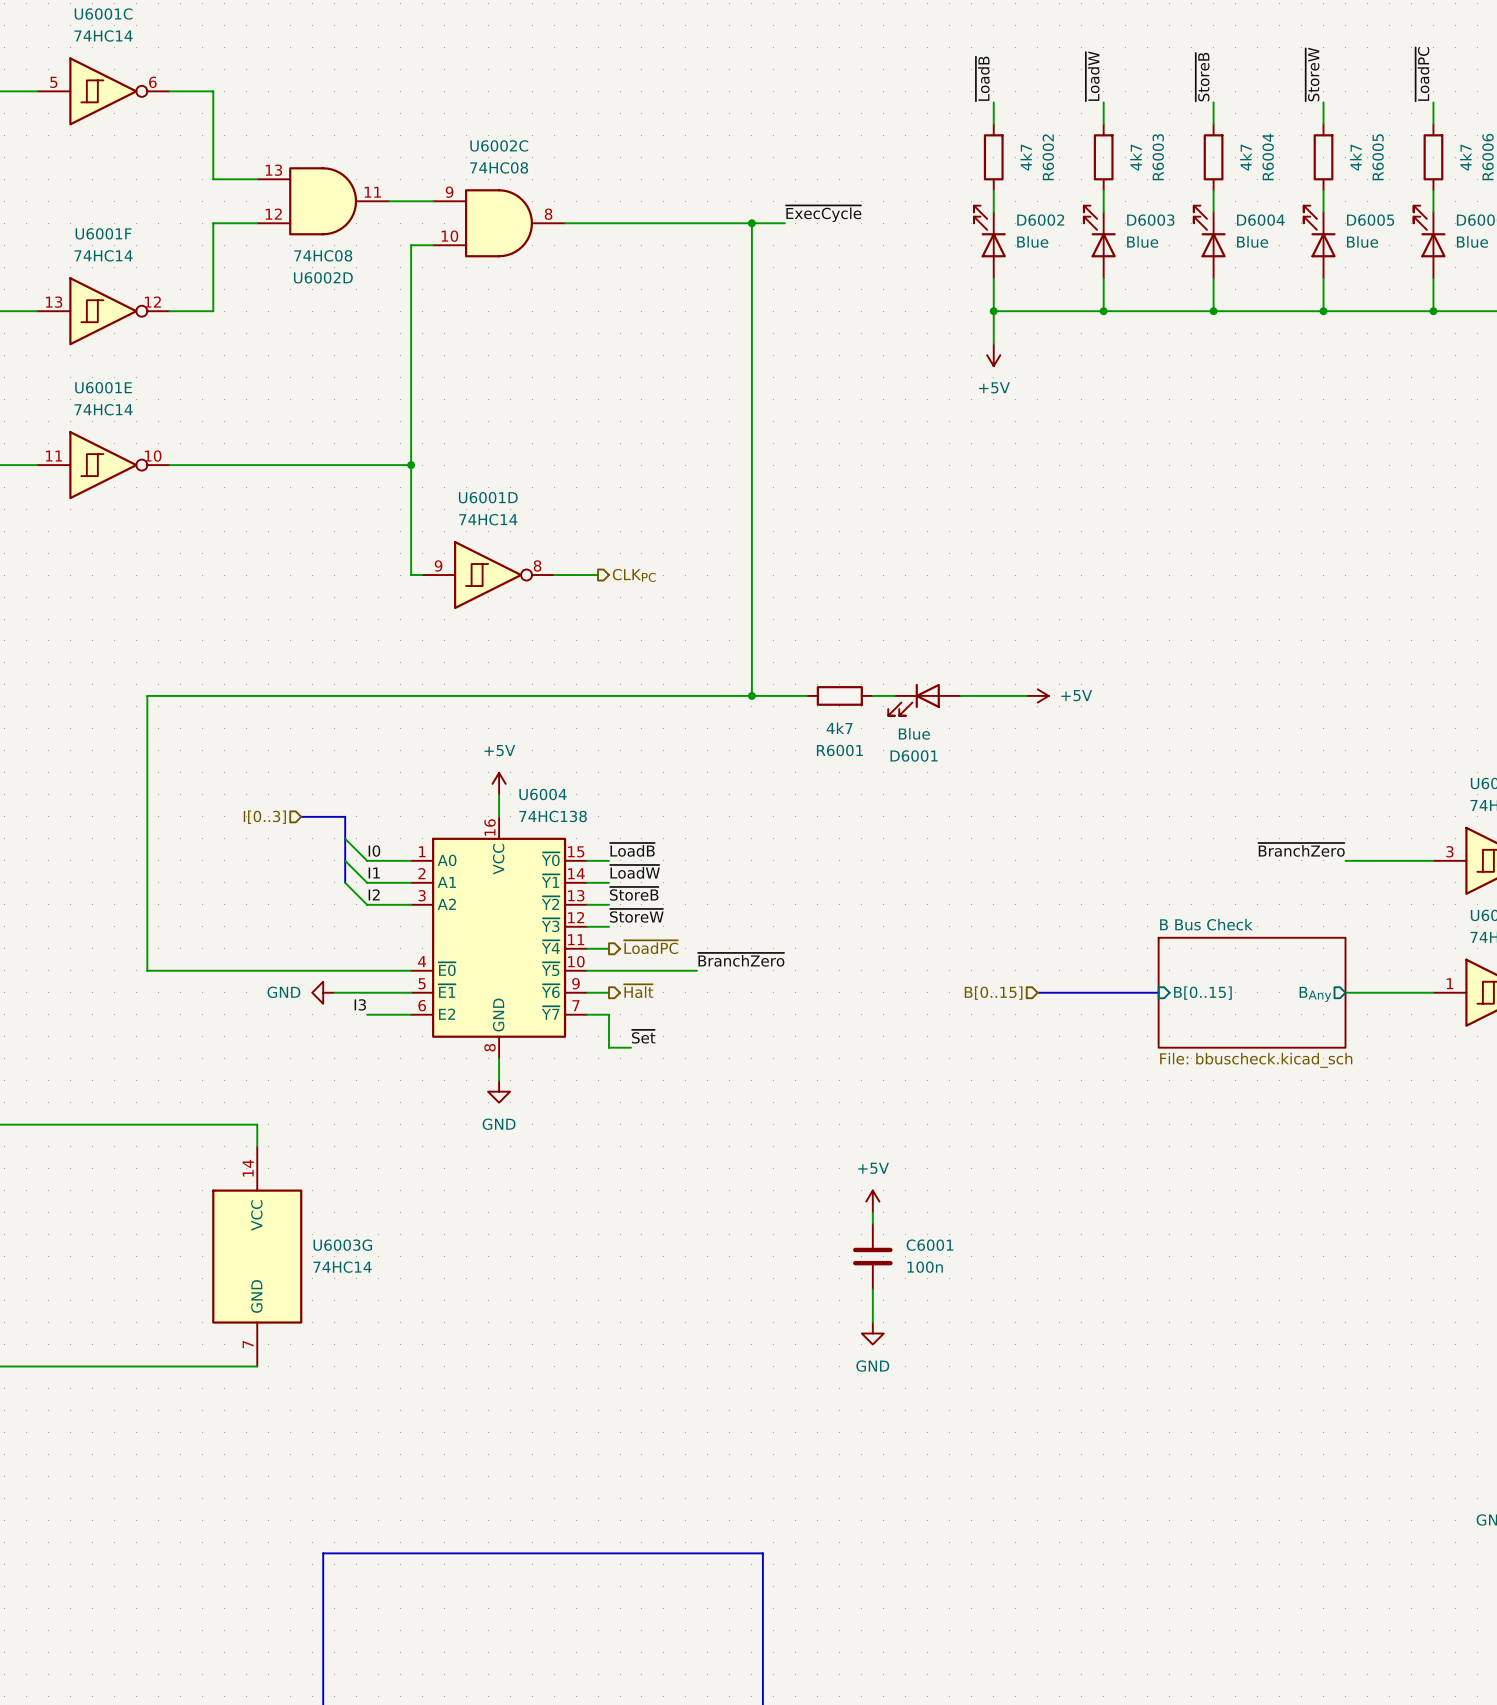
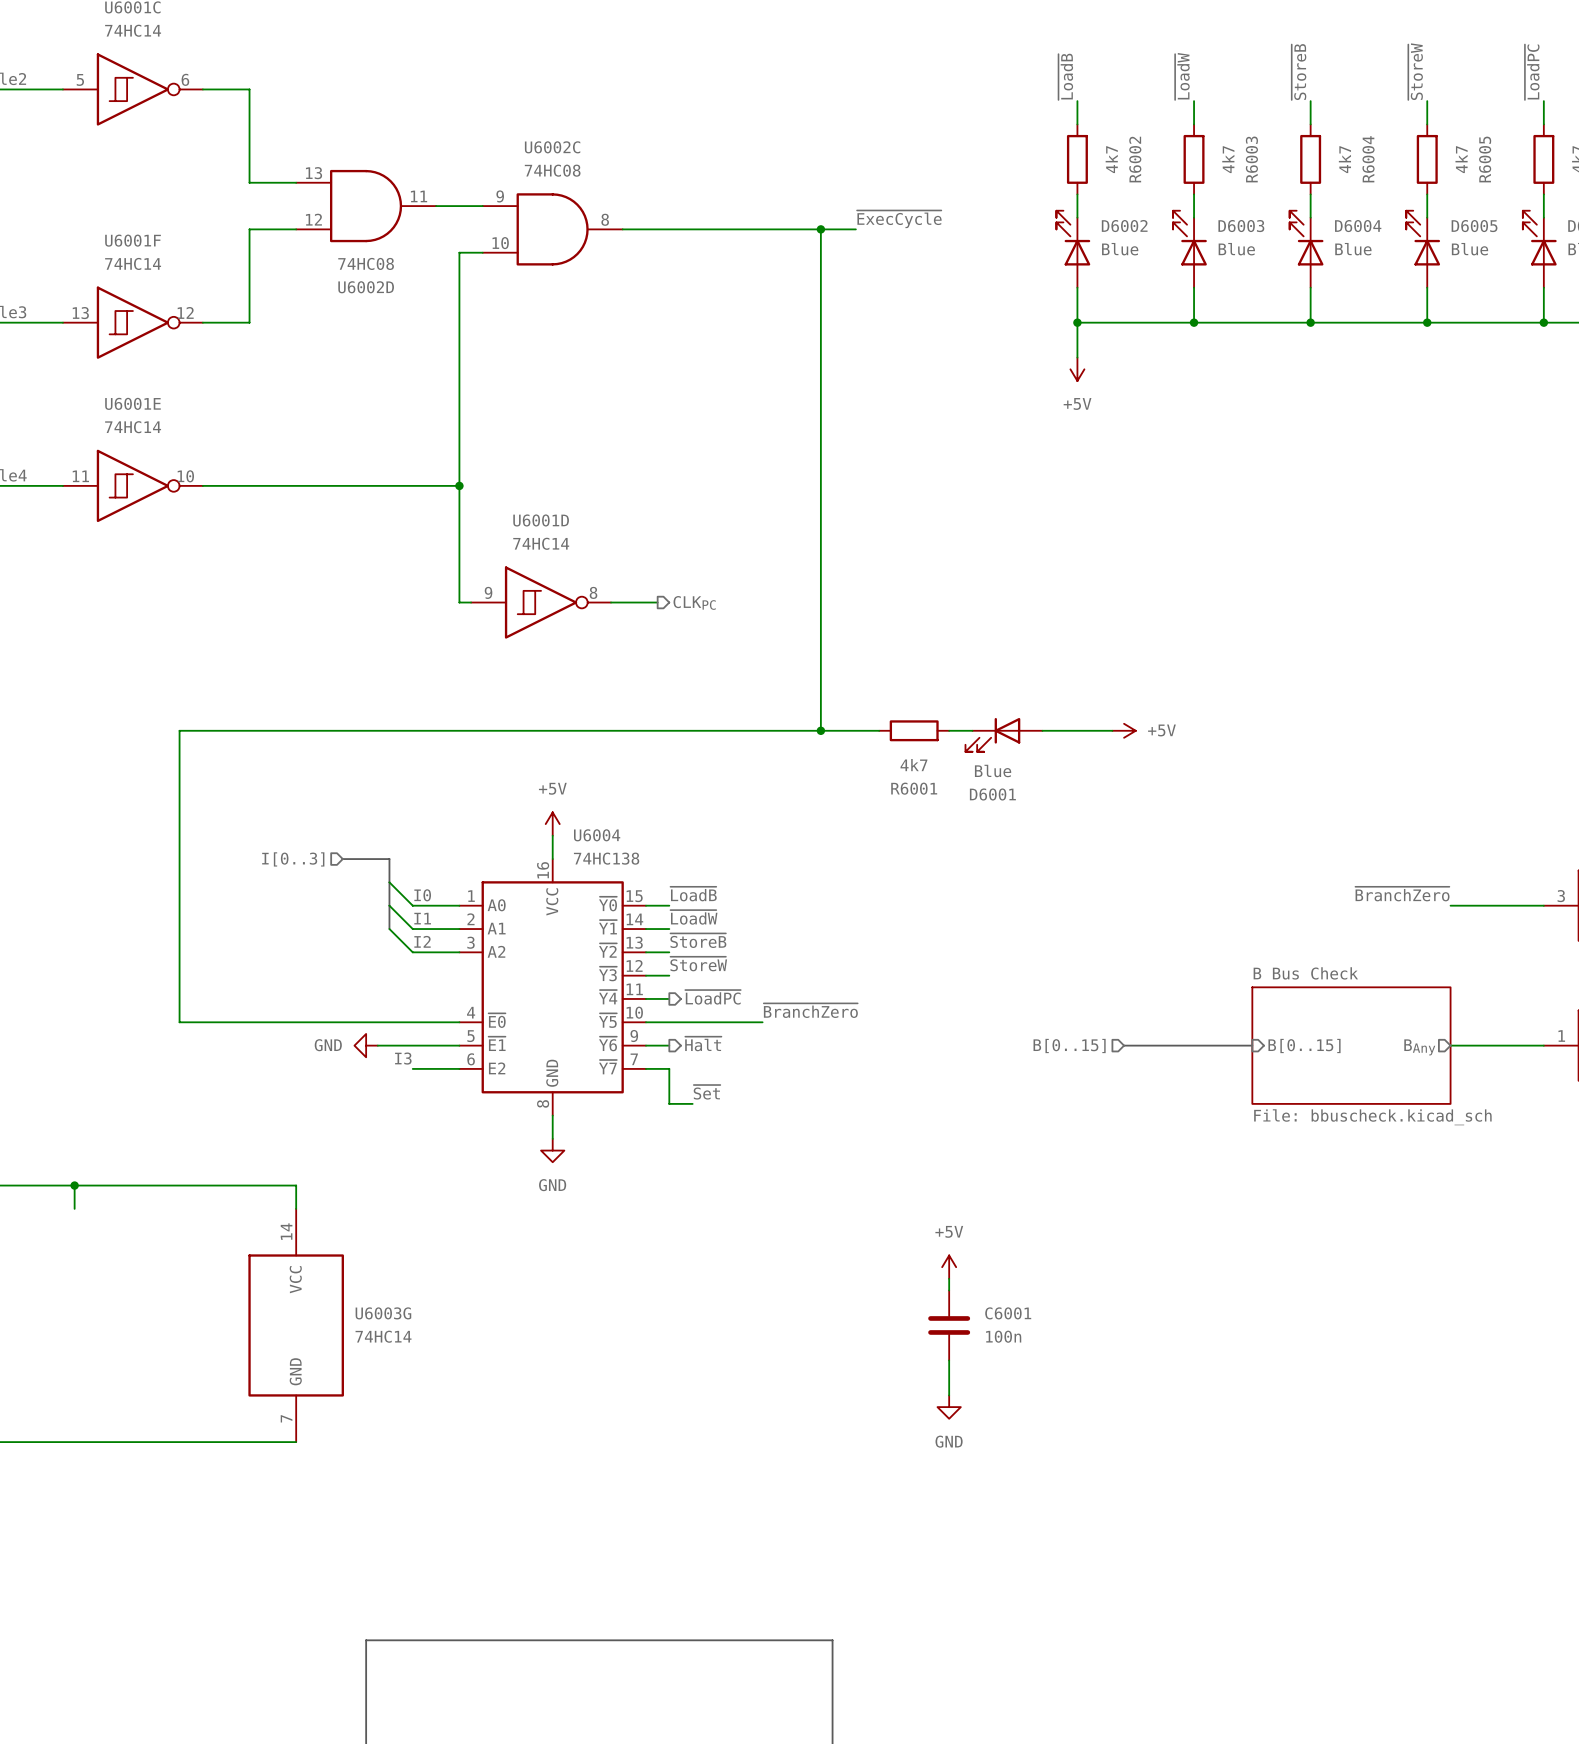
wire: none -> (74, 1185) (74, 1208)
junction: none -> (74, 1185)

